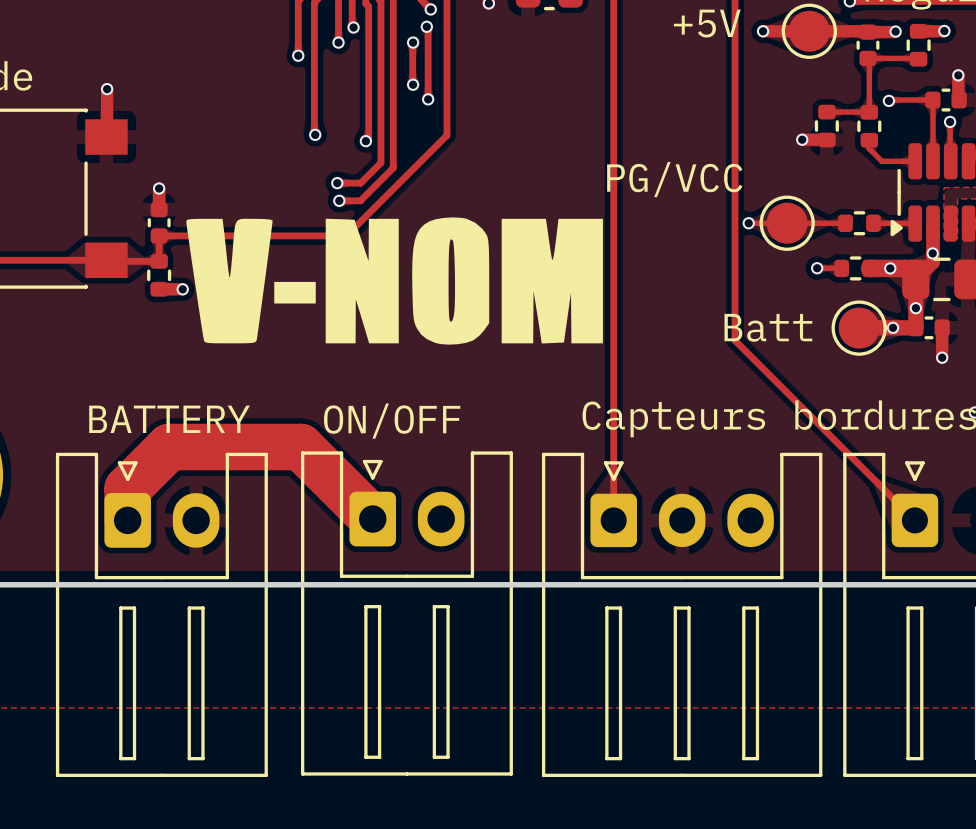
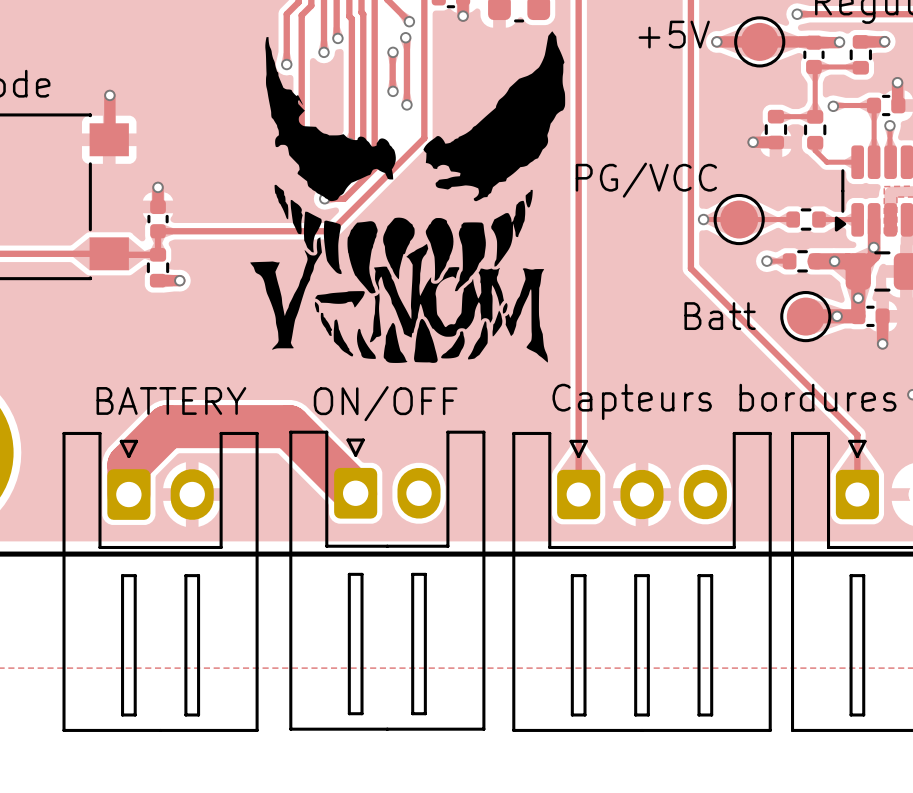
drawing: none -> [250, 31, 566, 363]
drawing: [186, 217, 603, 345] -> none
track: (735, 276) (735, 340) (914, 520) -> (690, 268) (857, 434) (857, 494)

